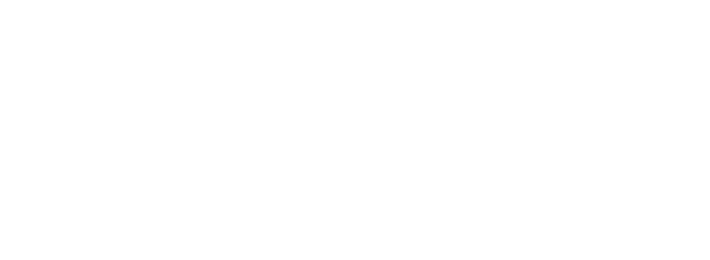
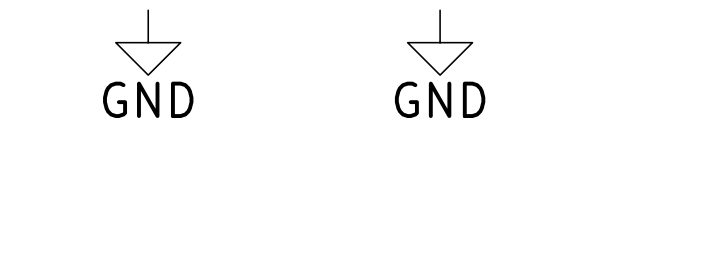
power symbol: none -> GND (148, 42)
power symbol: none -> GND (440, 42)

